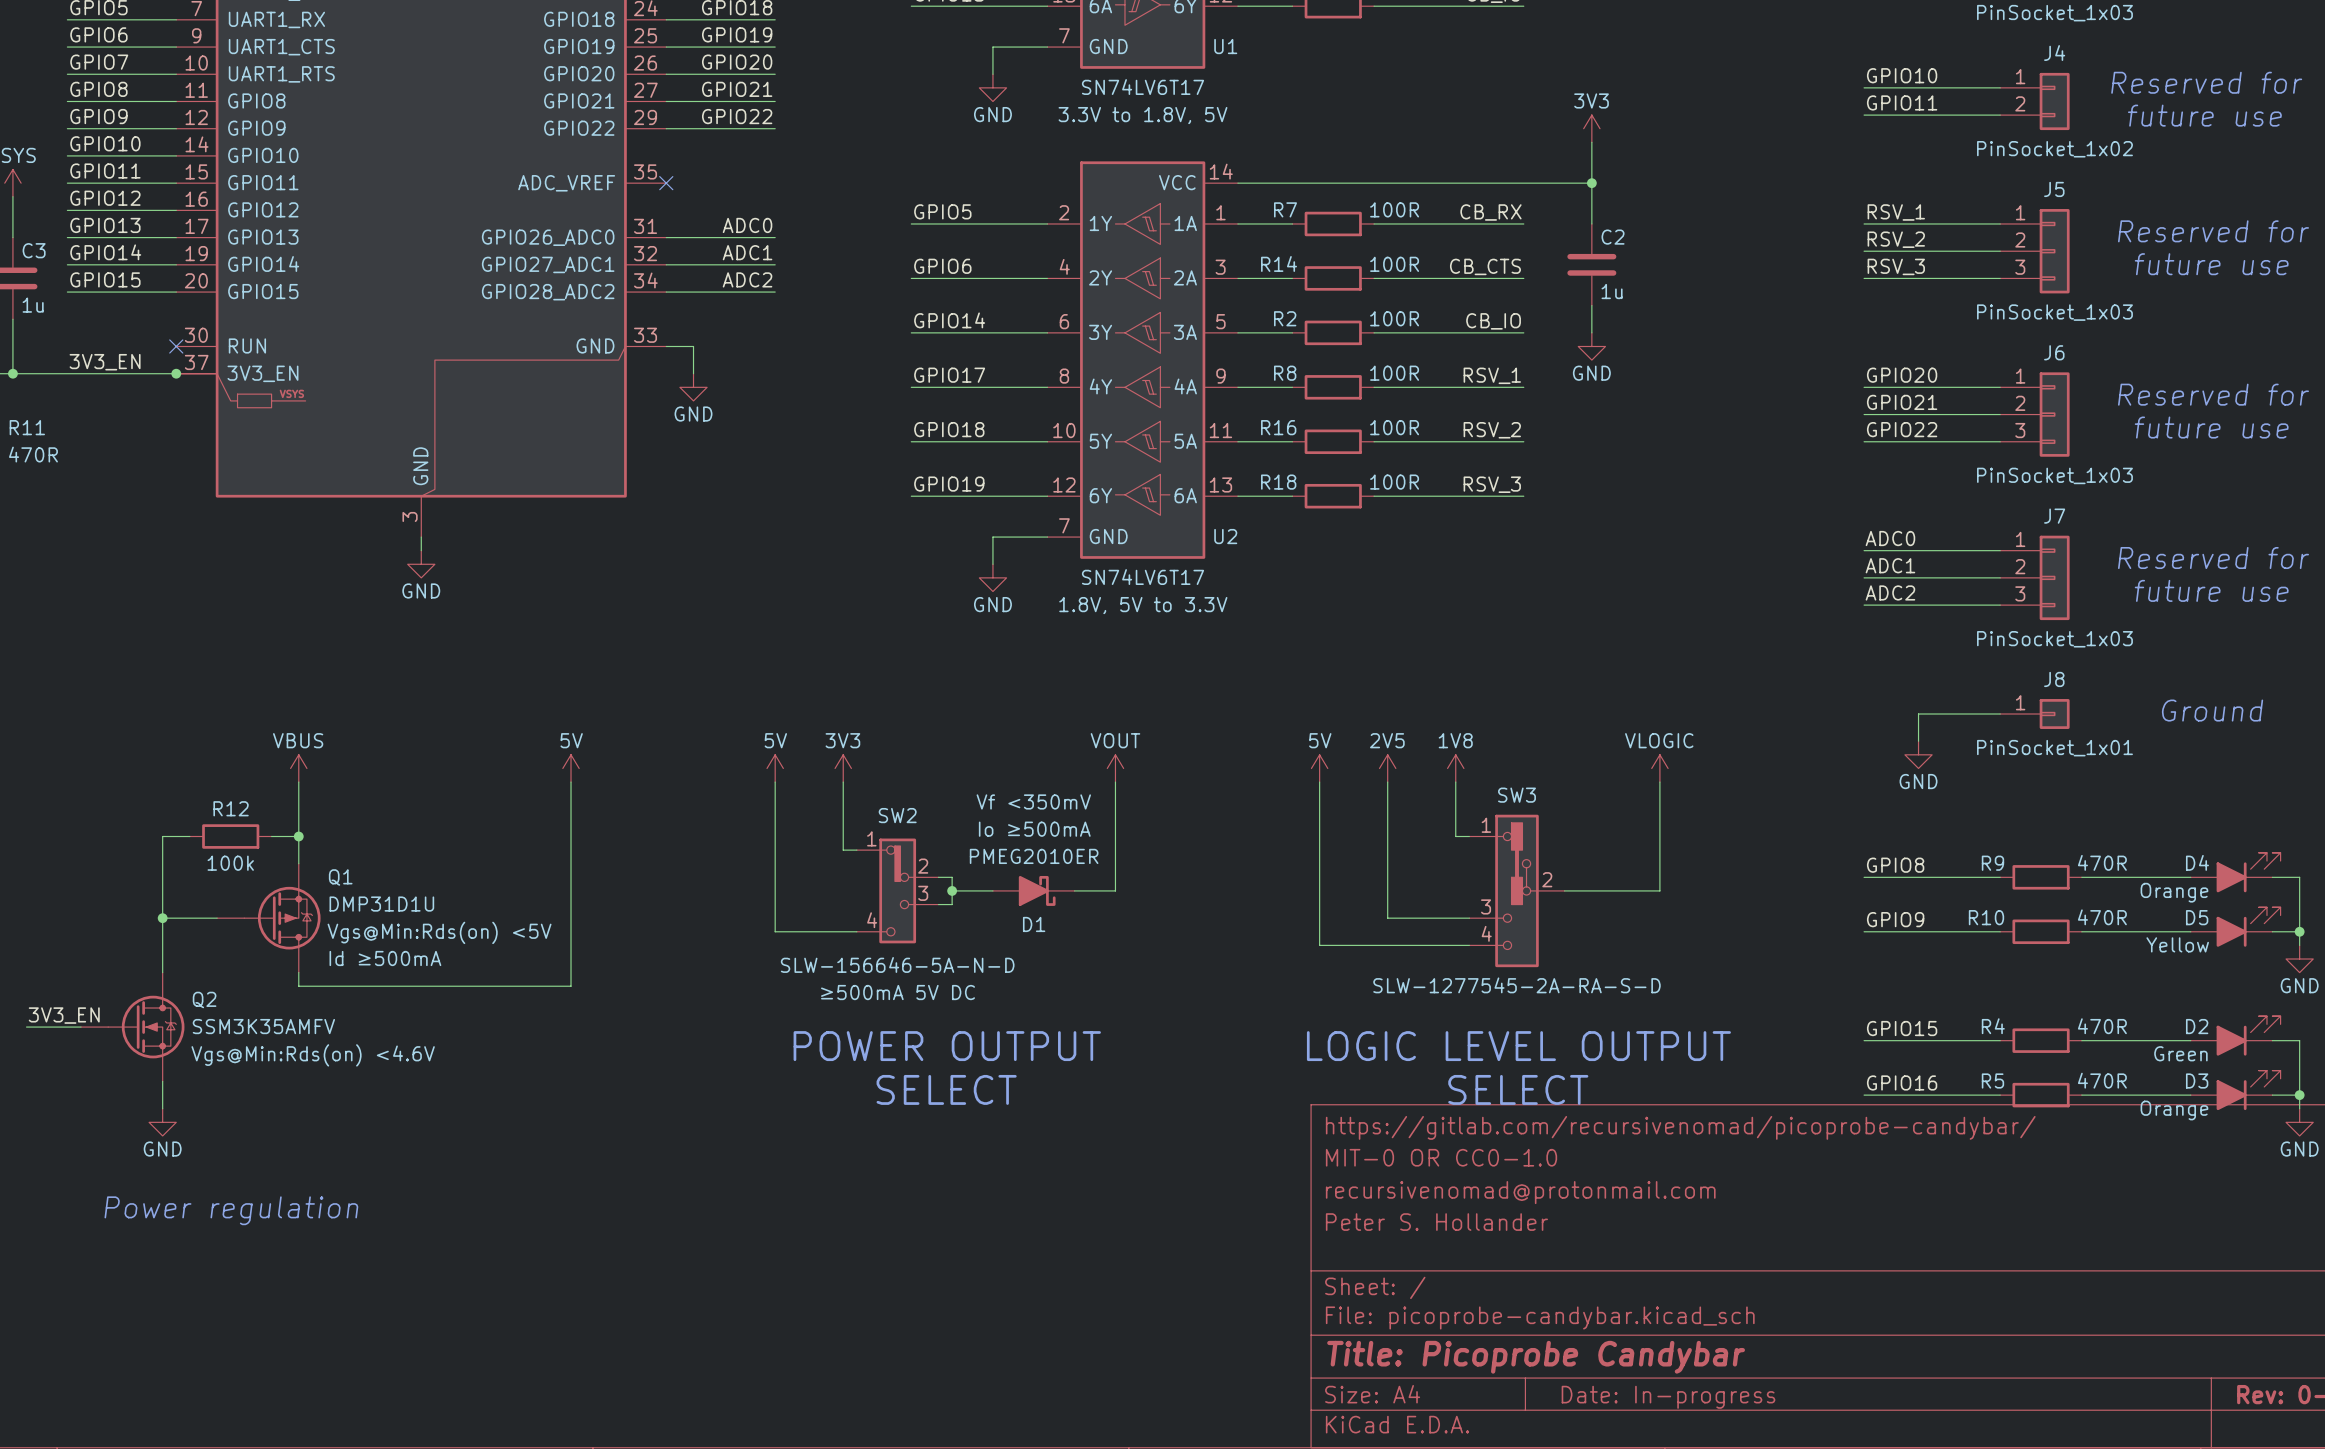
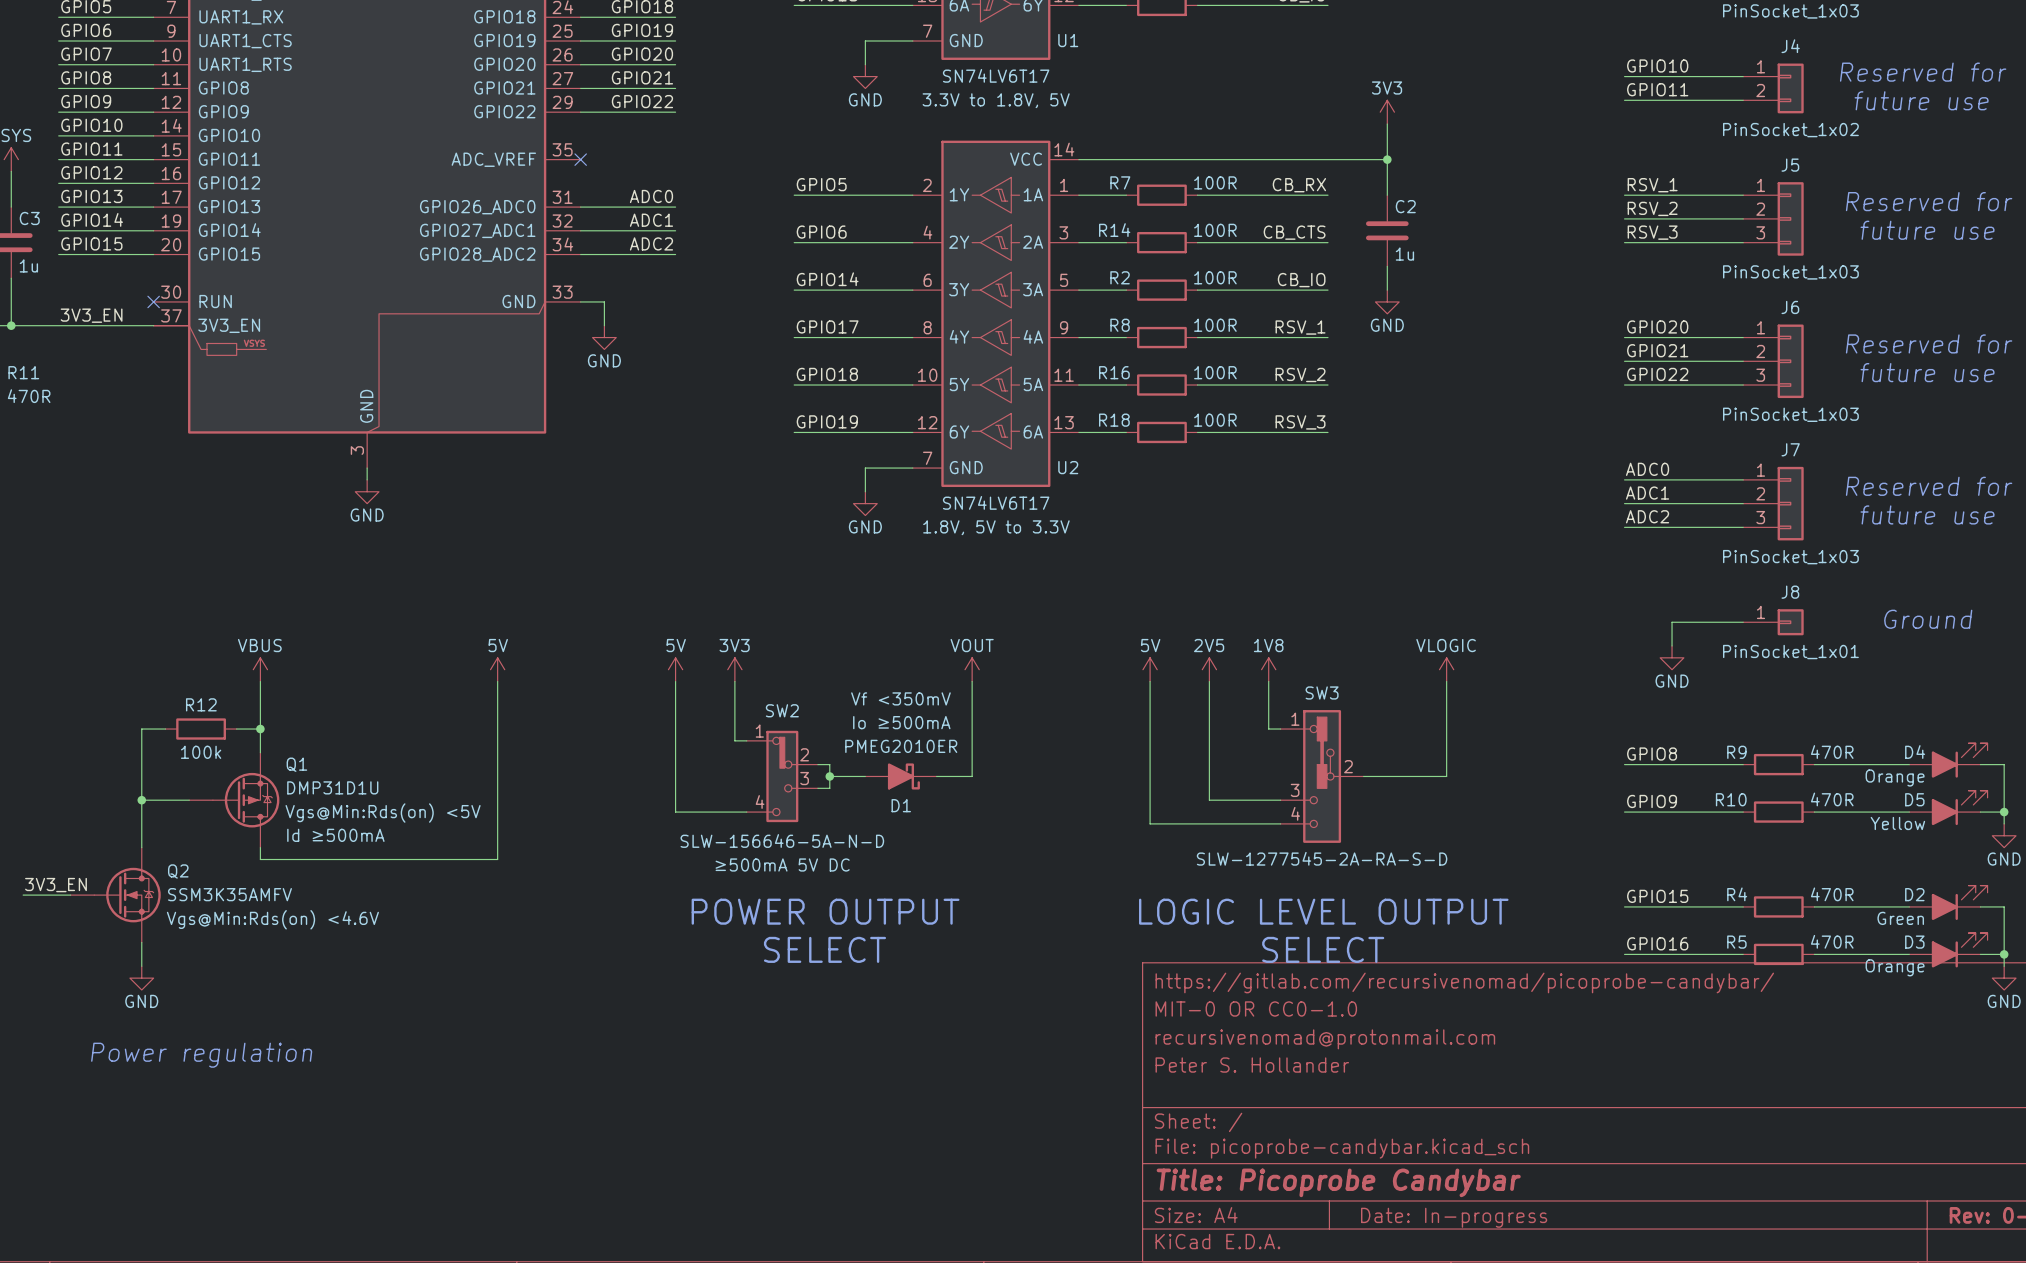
junction: (176, 373) -> none

